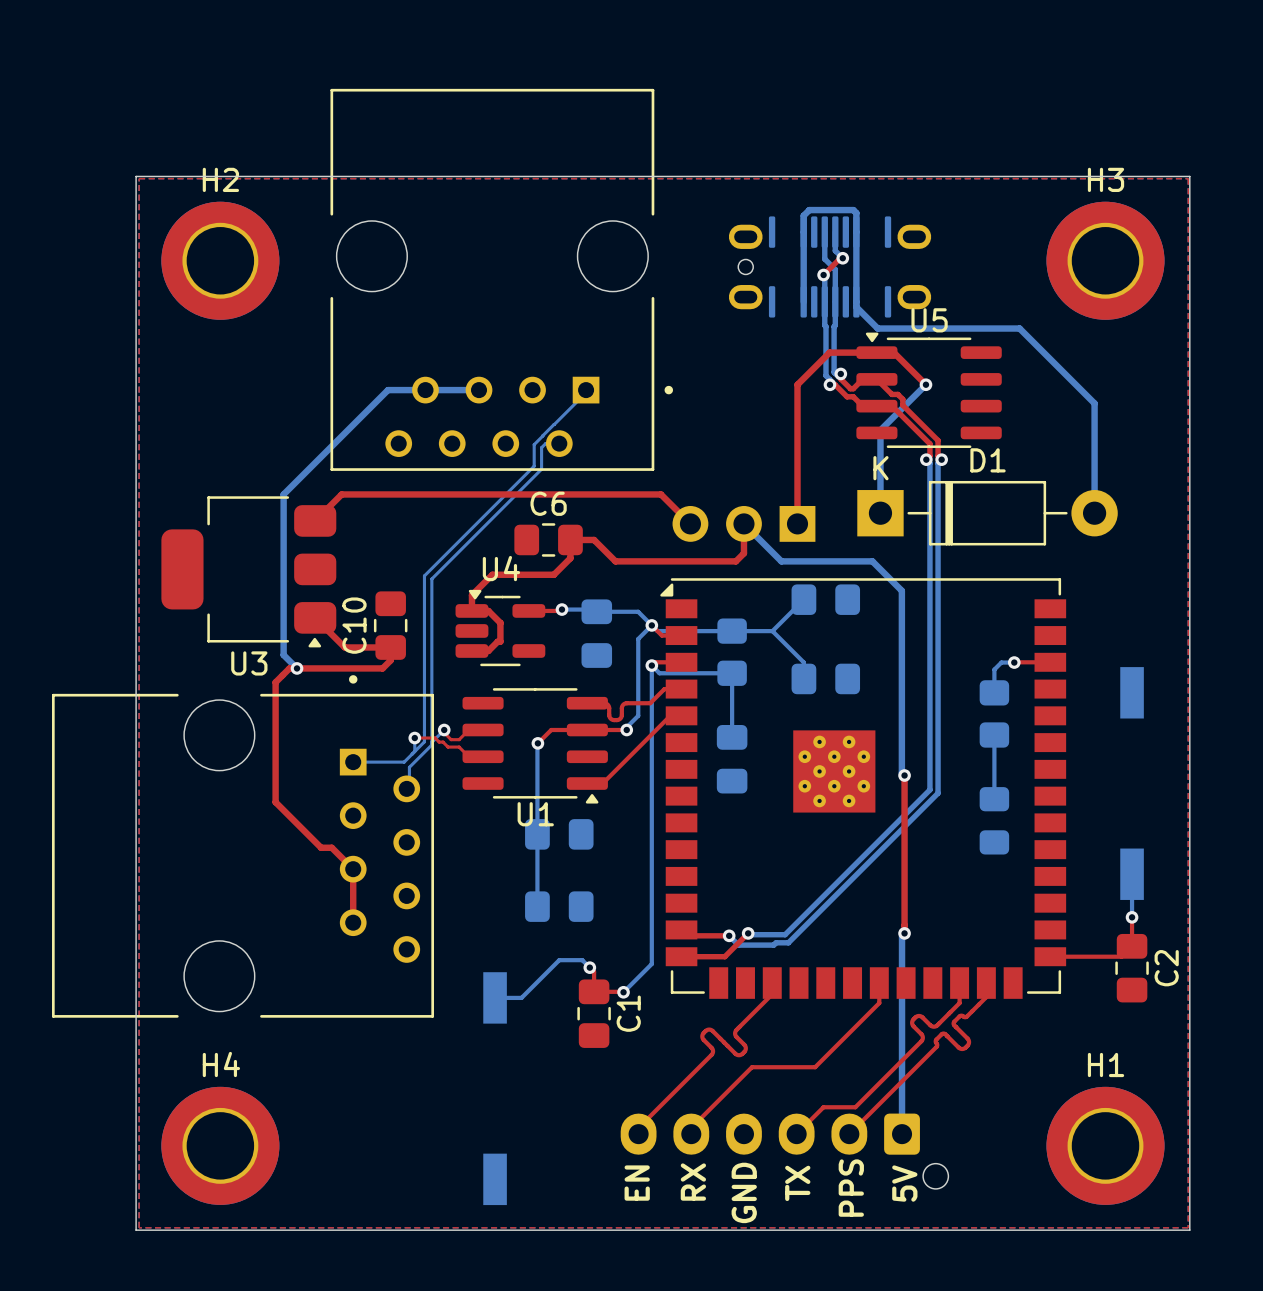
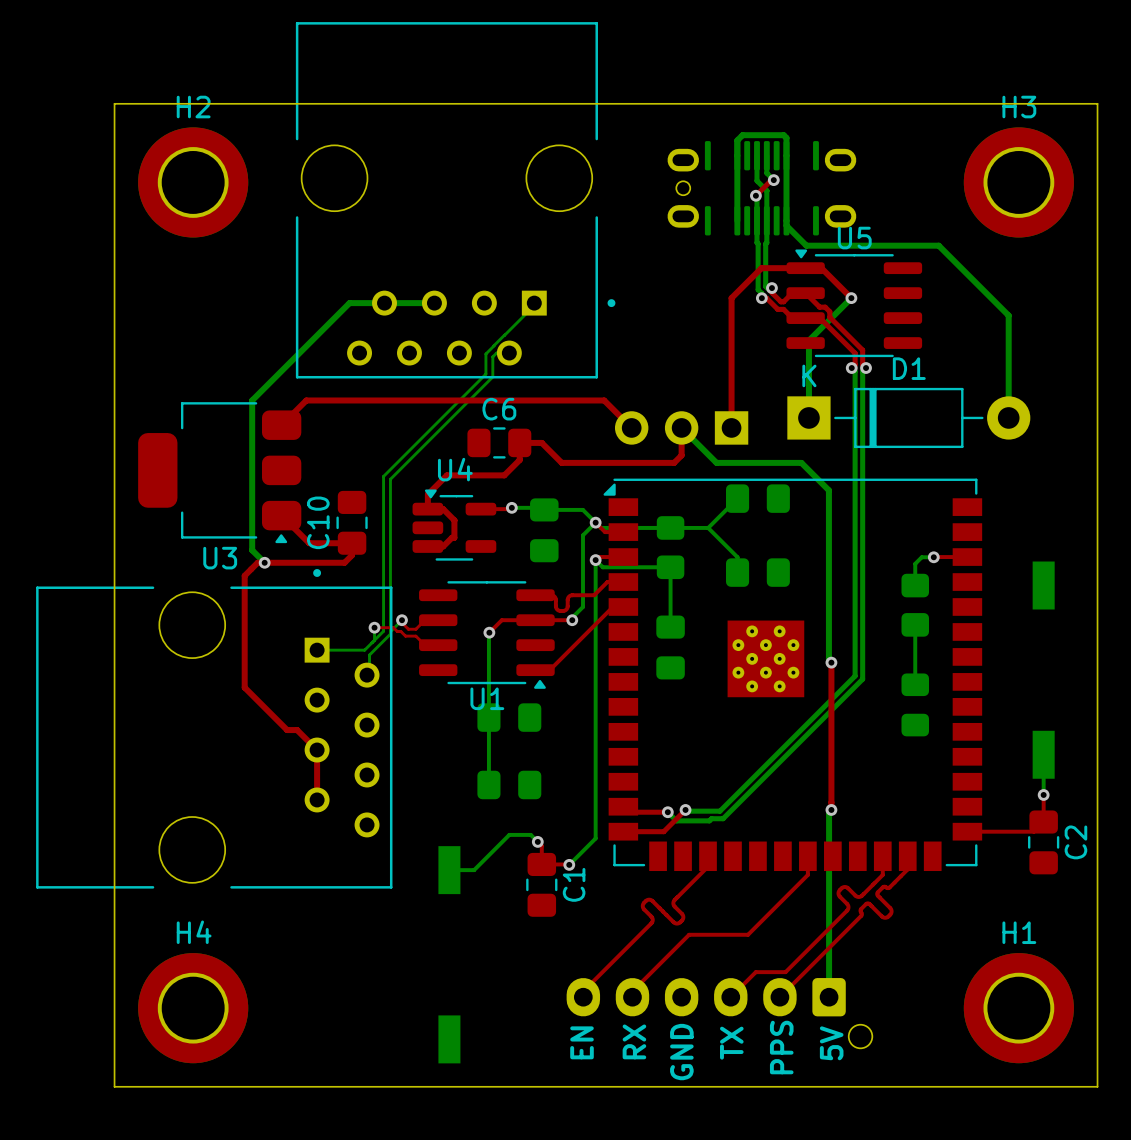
top zone outline: (139, 178) (1188, 178) (1188, 1227) (139, 1227) (139, 178) -> none

